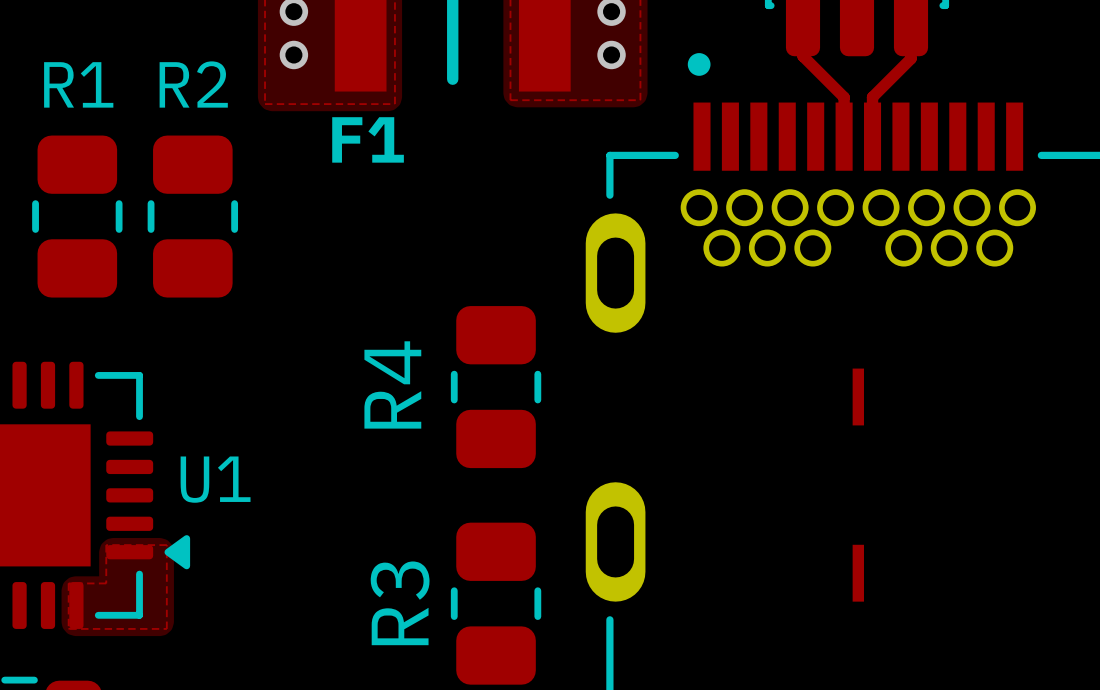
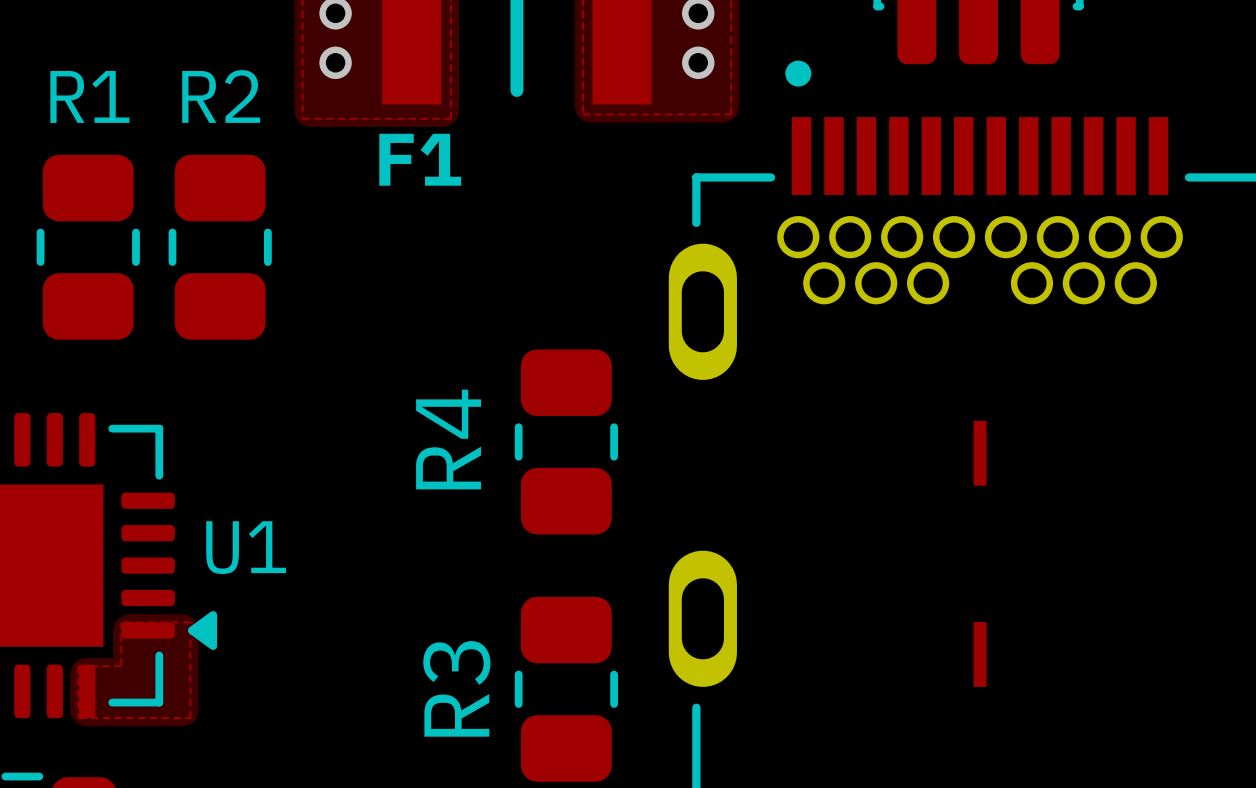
track: (803, 18) (803, 56) (844, 97) (844, 136) -> none
track: (911, 18) (911, 58) (872, 97) (872, 136) -> none

